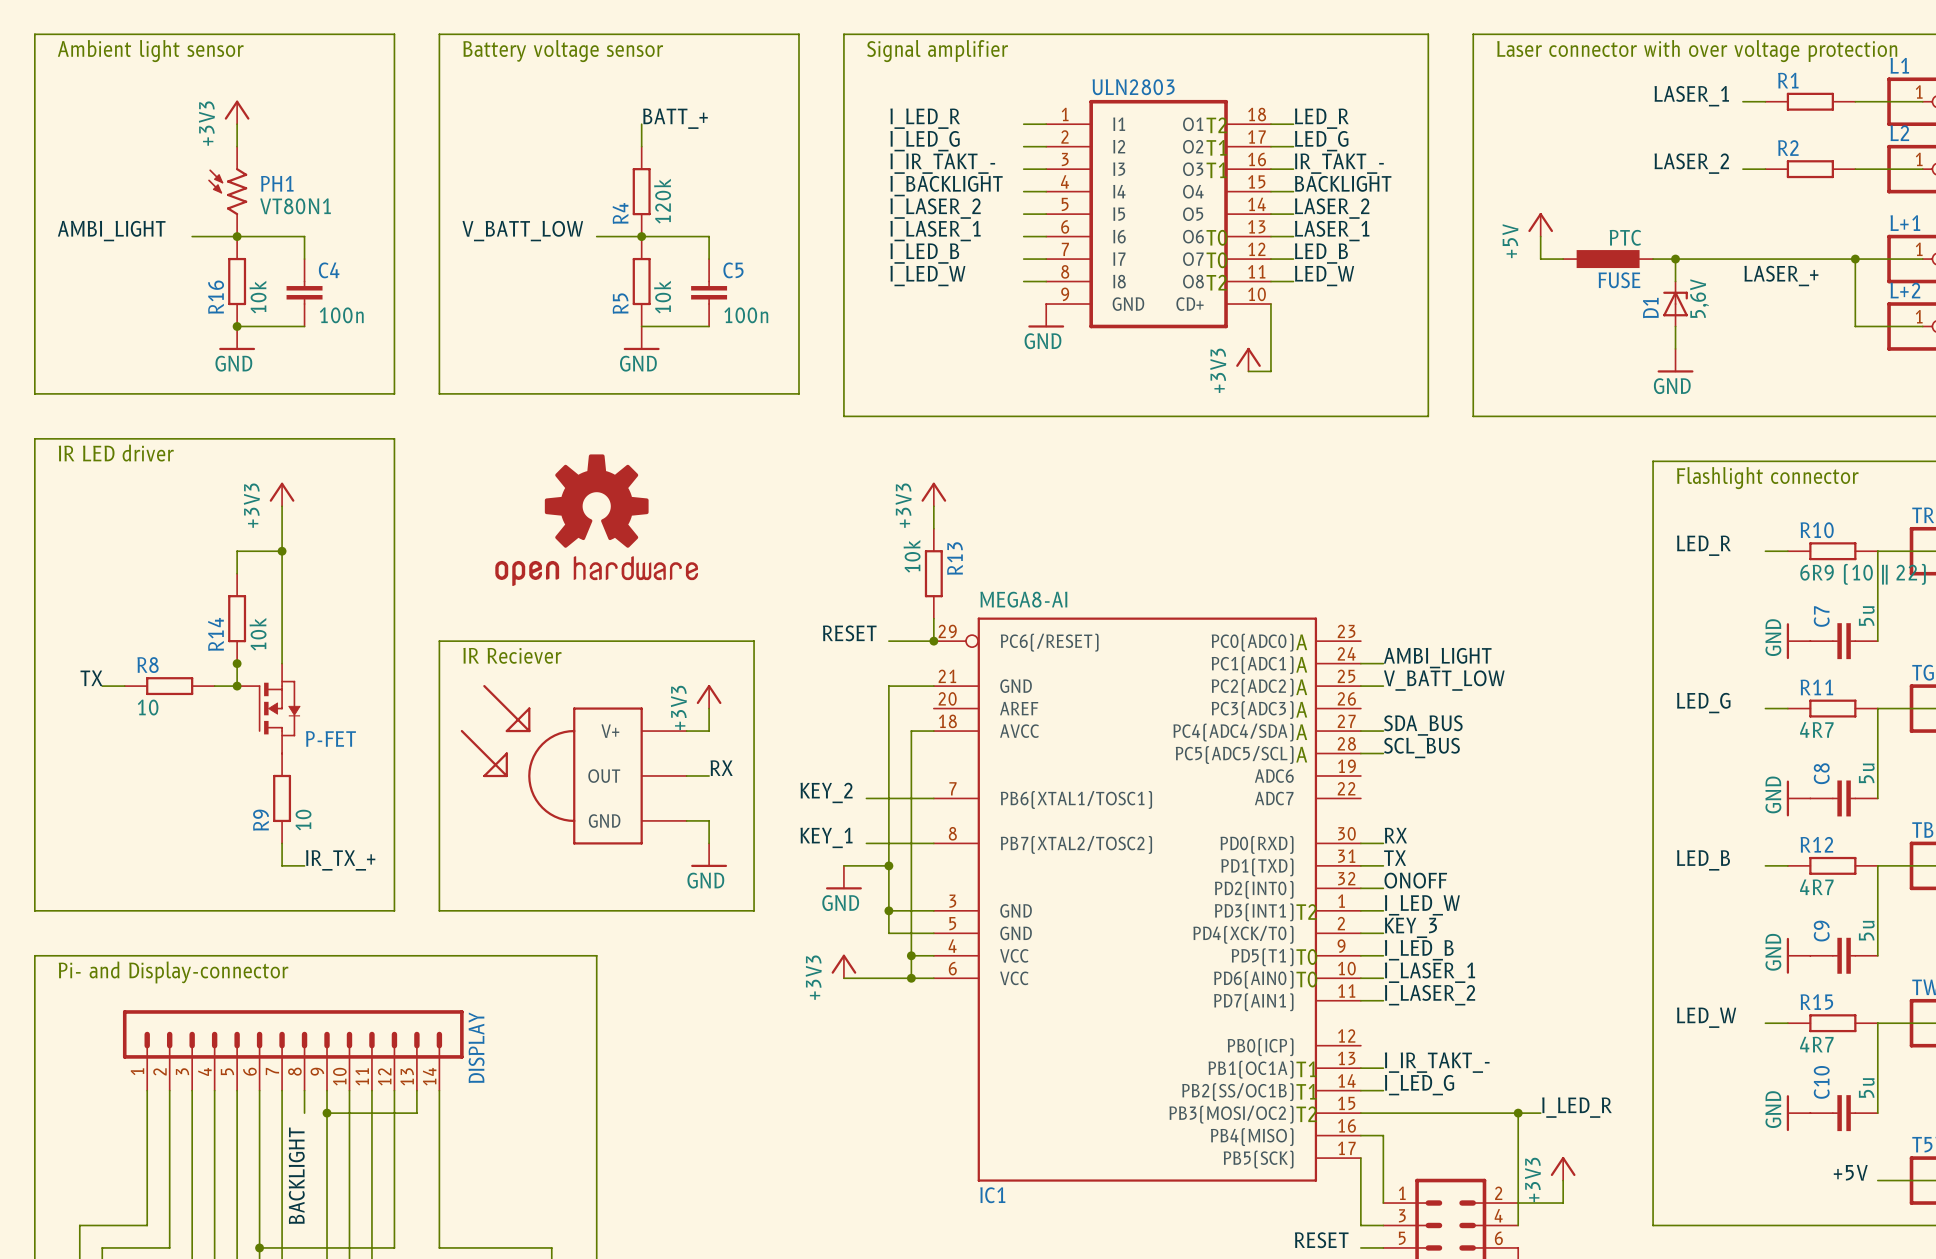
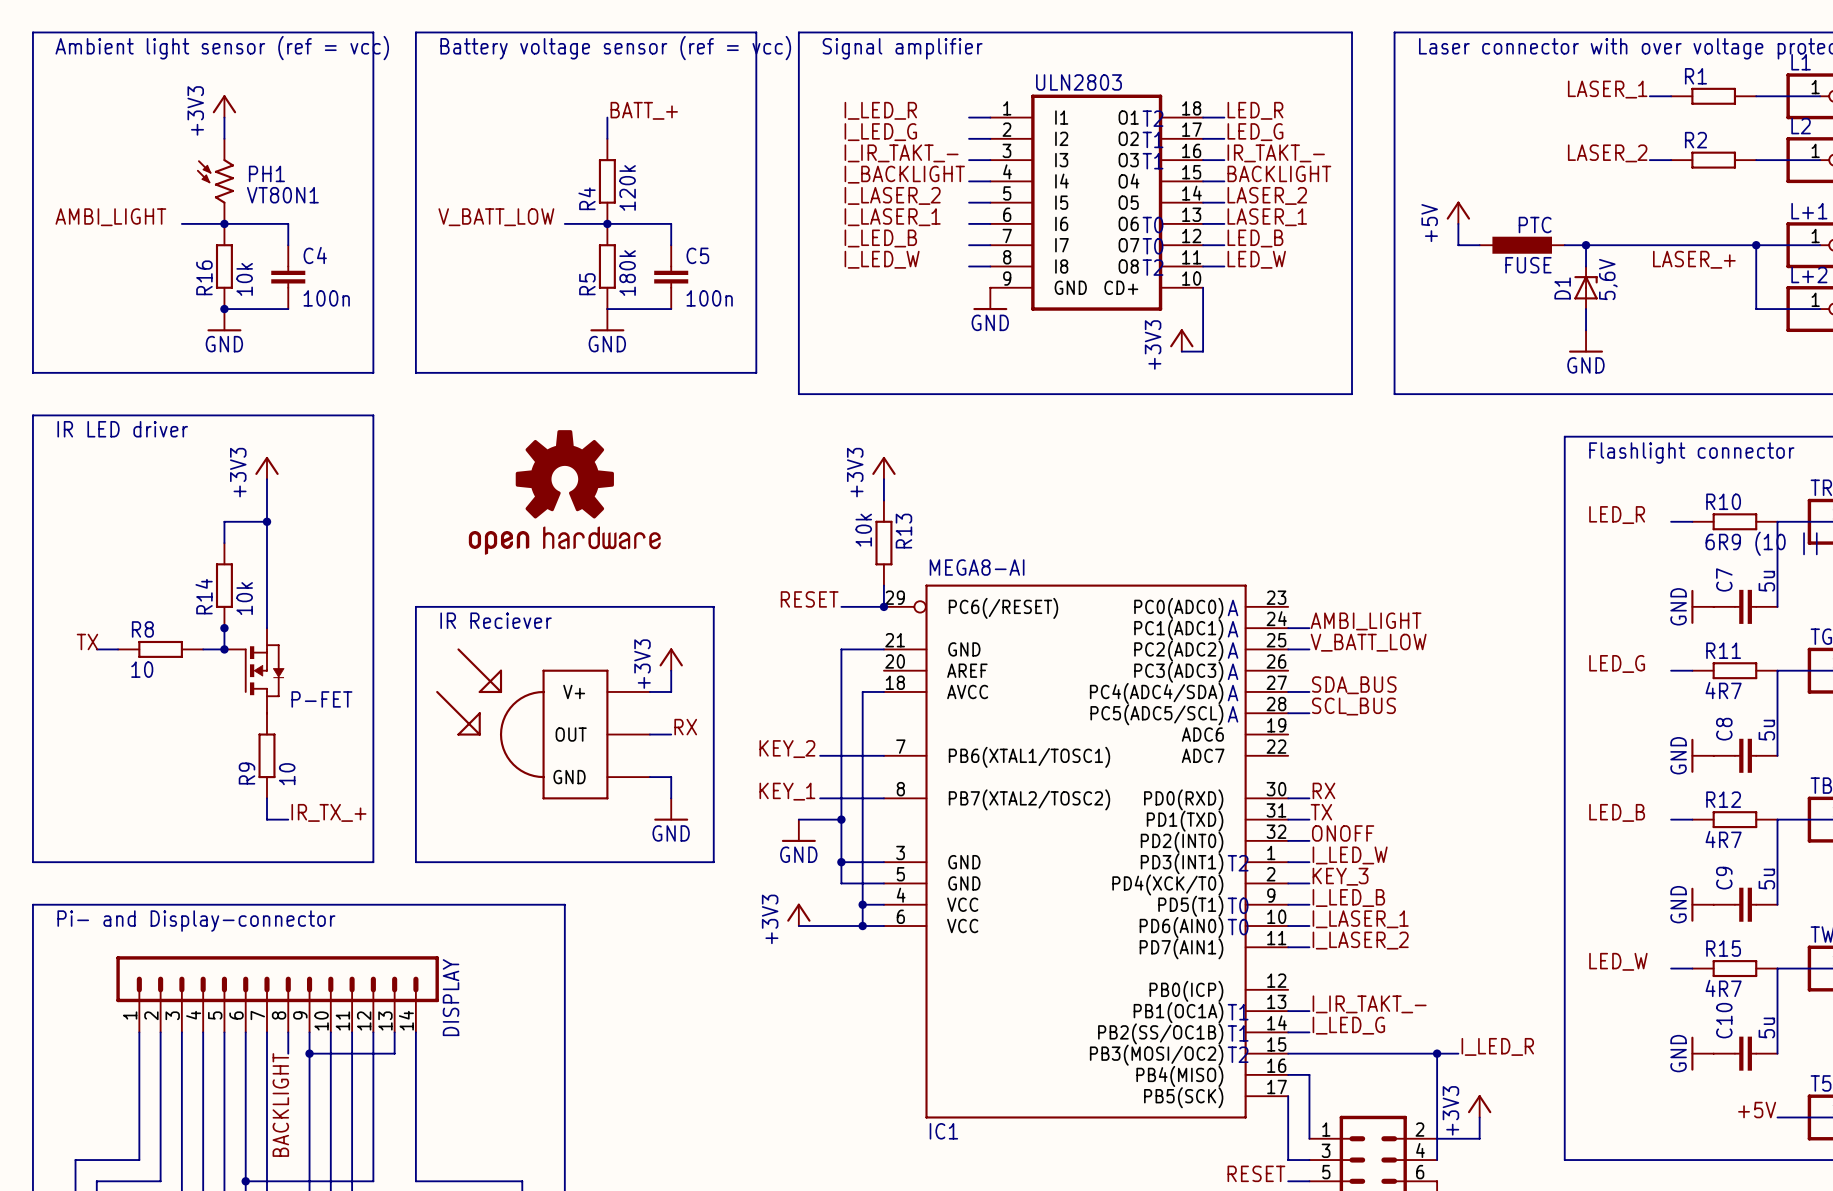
text: Ambient light sensor (150, 51) -> Ambient light sensor (ref = vcc) (222, 48)
text: Battery voltage sensor (563, 51) -> Battery voltage sensor (ref = vcc) (615, 48)
R5 value: 10k (662, 297) -> 180k (627, 273)

